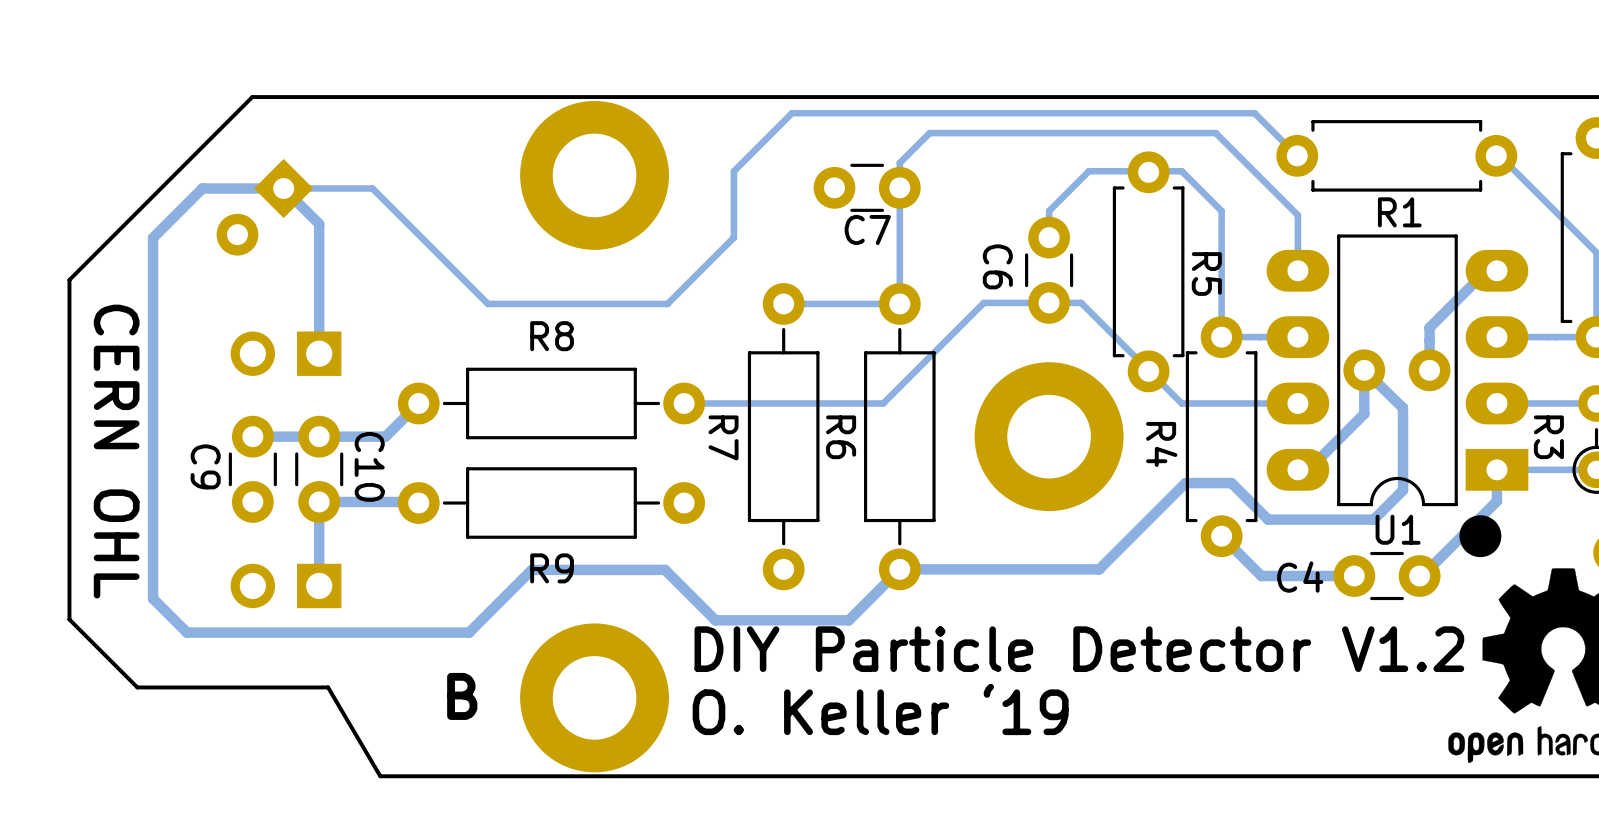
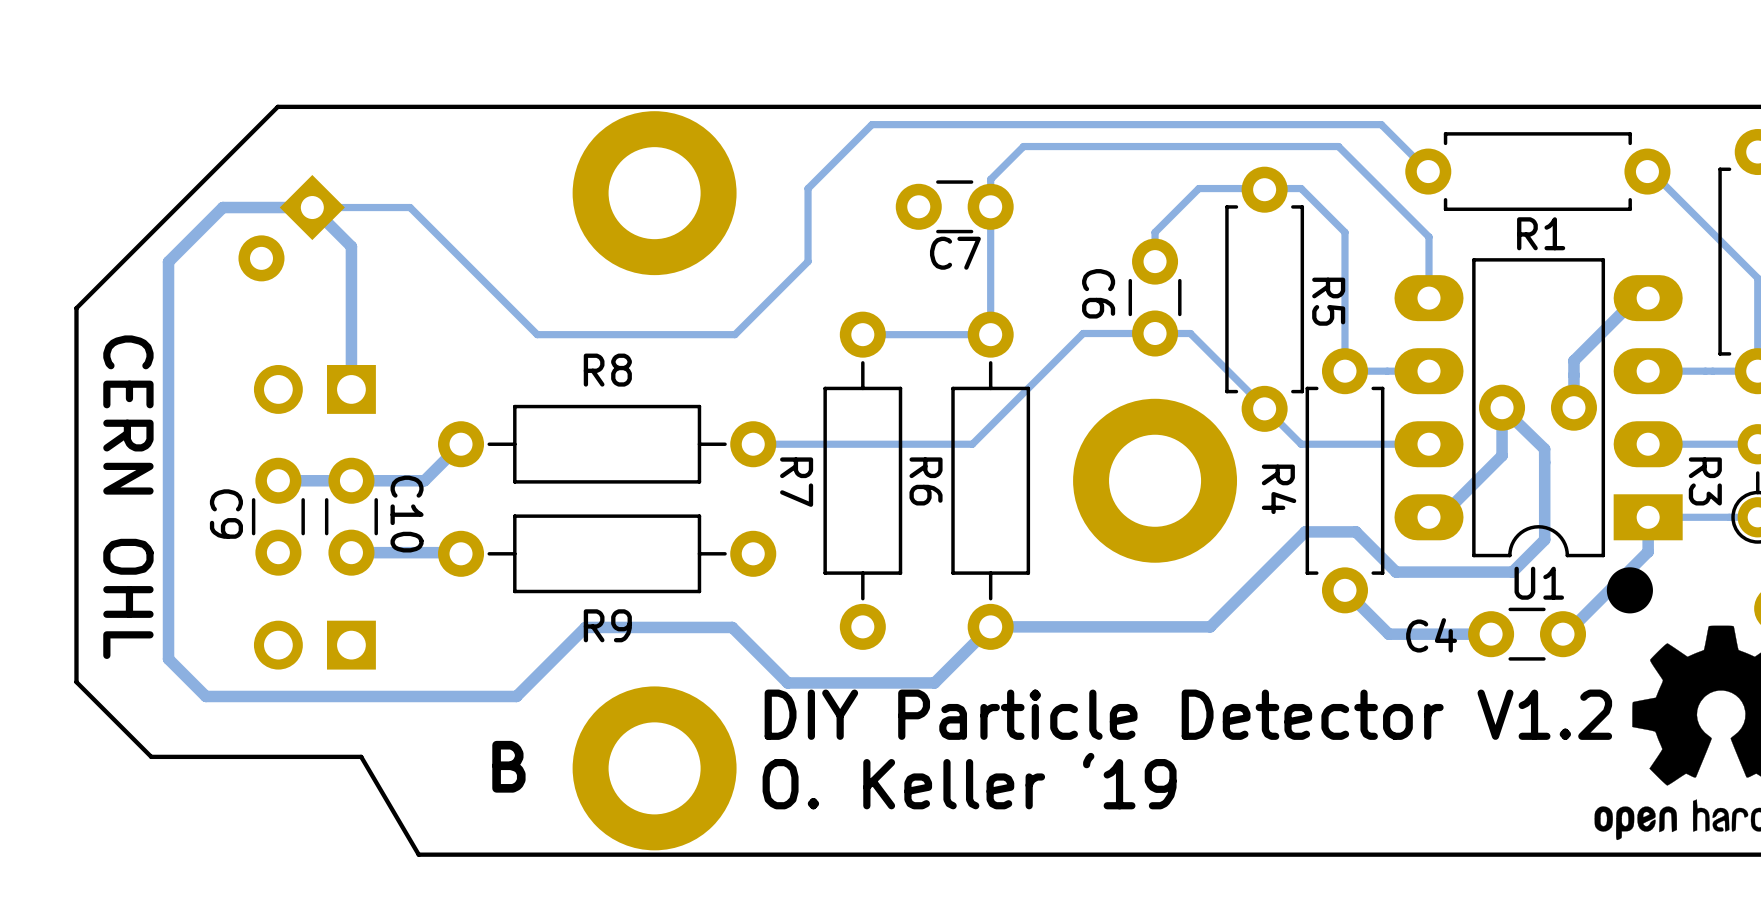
track: (319, 515) (319, 577) -> none

